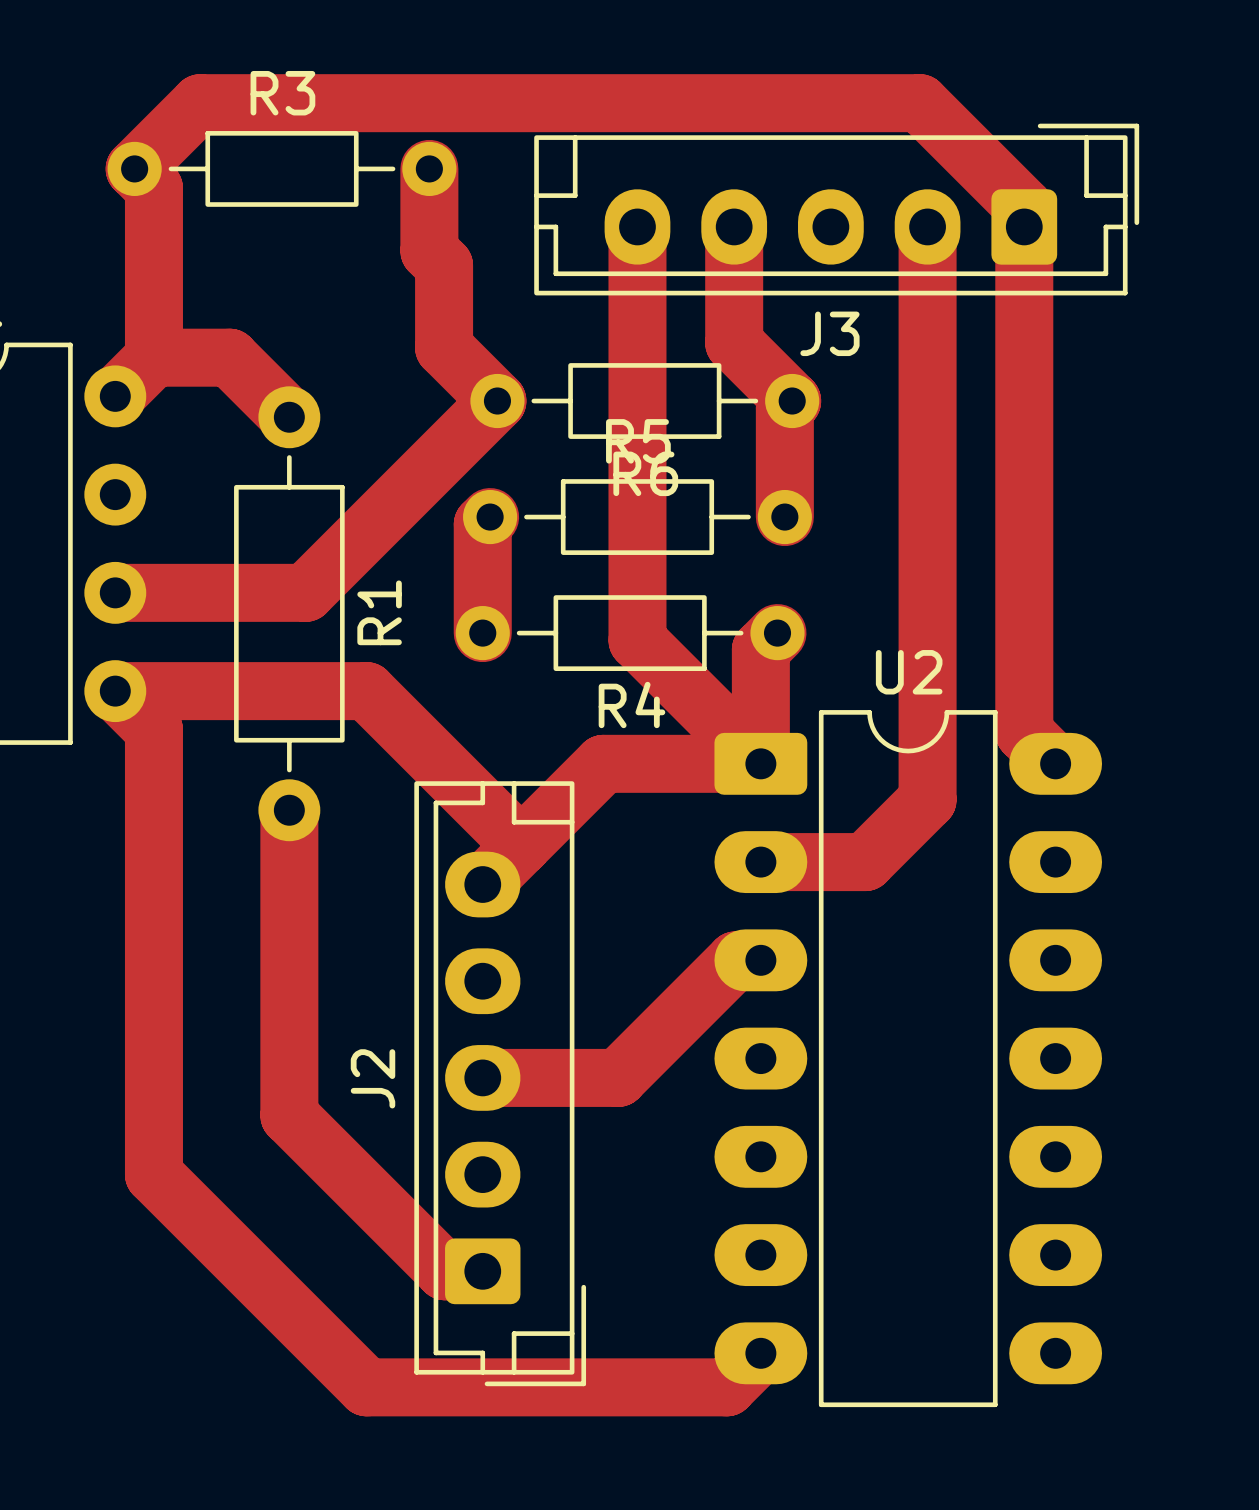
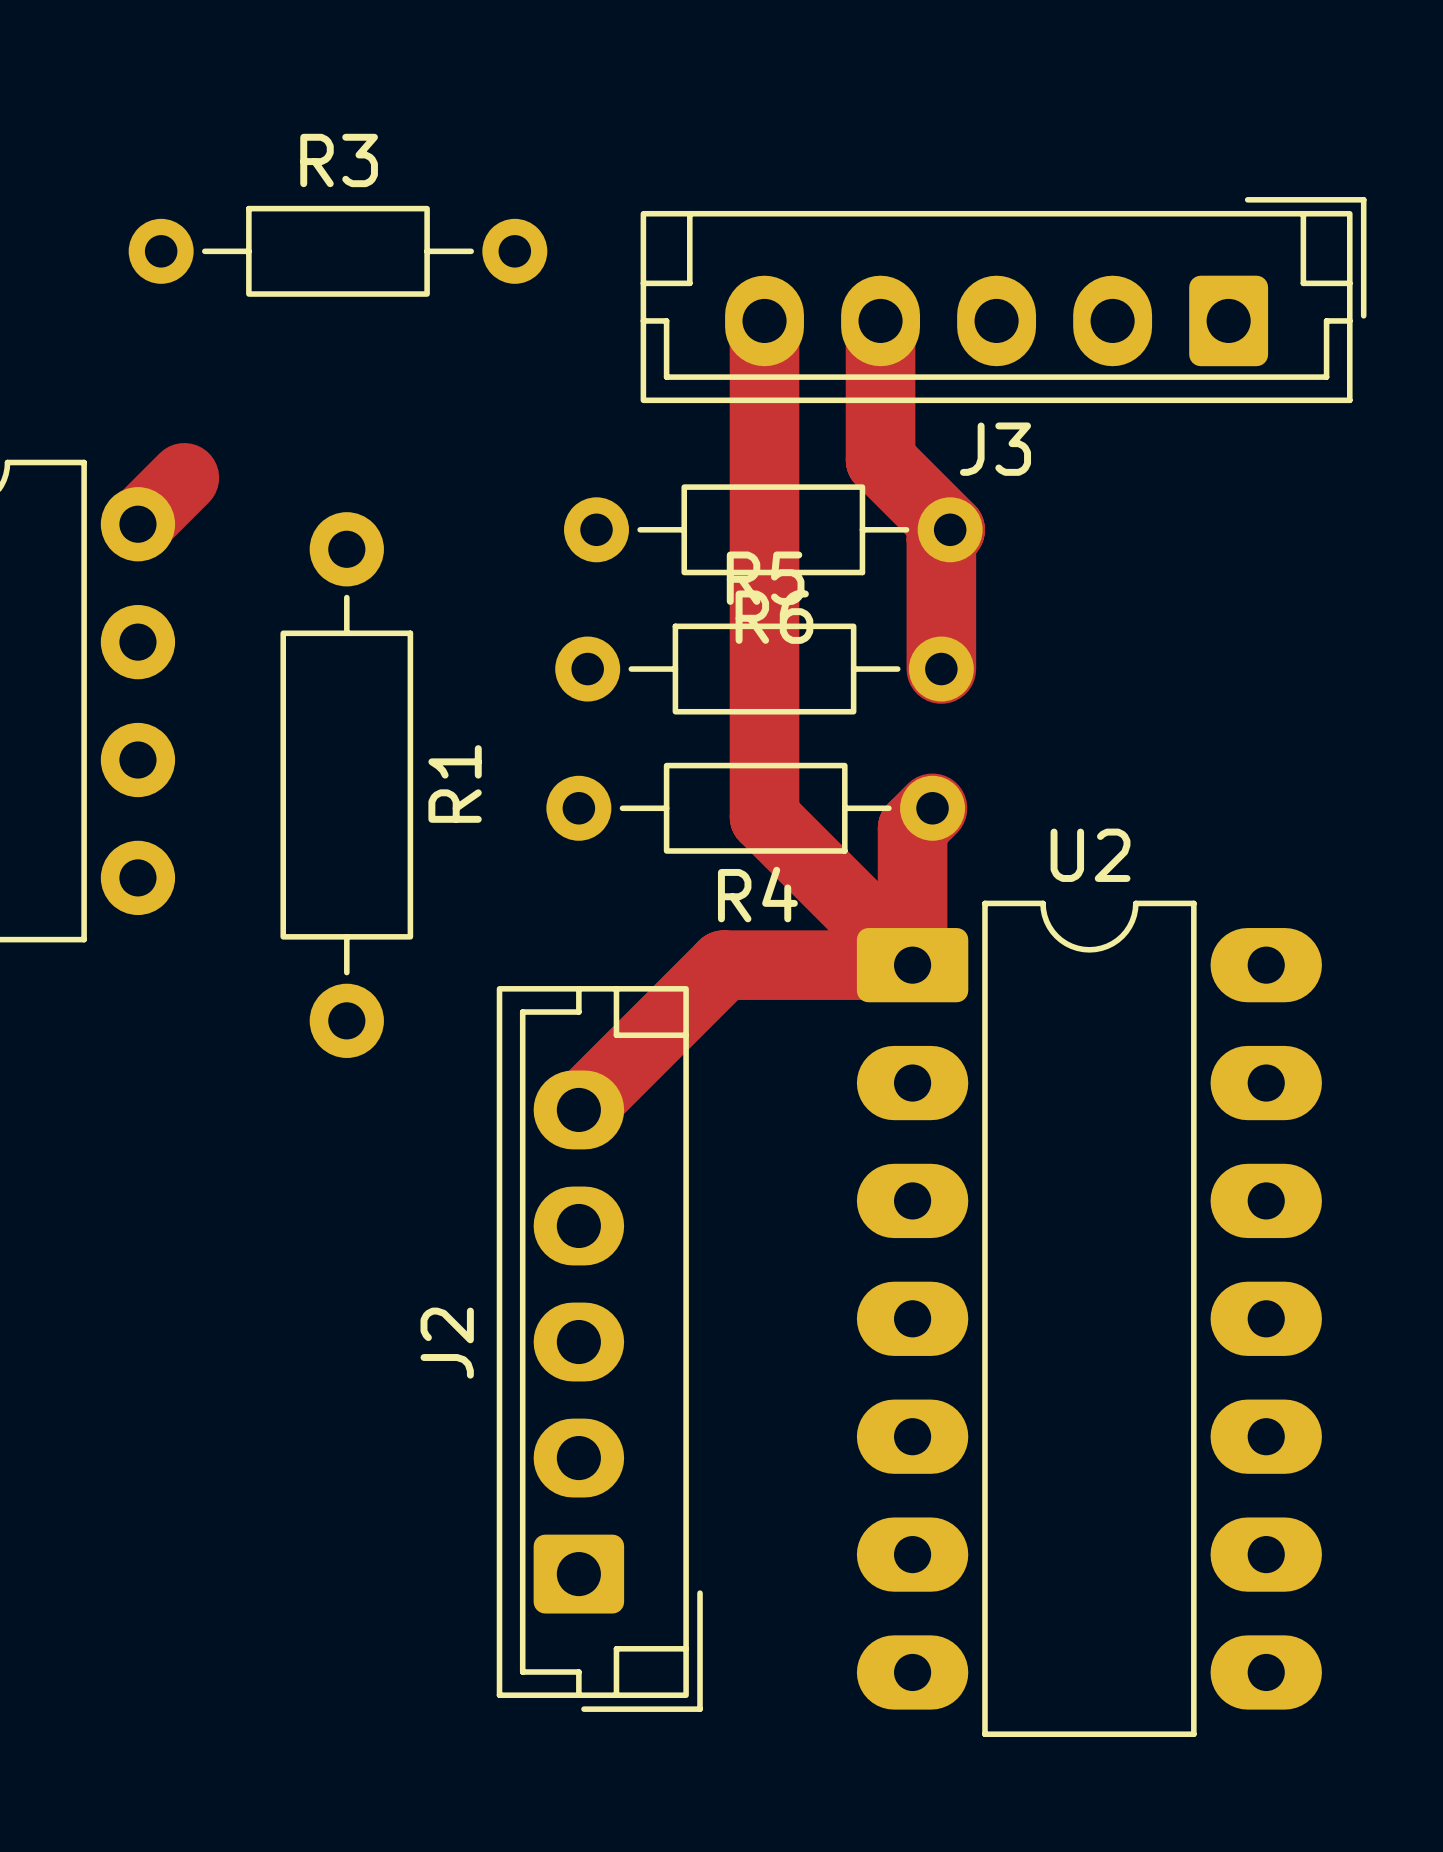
track: (429, 168) (429, 250) (444, 265) (444, 347) (497, 401) (305, 592) (115, 592) -> none
track: (927, 226) (927, 799) (865, 862) (760, 862) -> none
track: (289, 417) (229, 357) (153, 357) (153, 188) (134, 168) (200, 103) (919, 103) (1024, 207) (1024, 732) (1055, 763) -> none
track: (490, 517) (482, 524) (482, 633) -> none
track: (289, 810) (289, 1115) (445, 1271) (482, 1271) -> none
track: (521, 845) (366, 691) (115, 691) (153, 729) (153, 1174) (366, 1387) (726, 1387) (760, 1353) -> none
track: (760, 960) (735, 960) (618, 1077) (482, 1077) -> none

